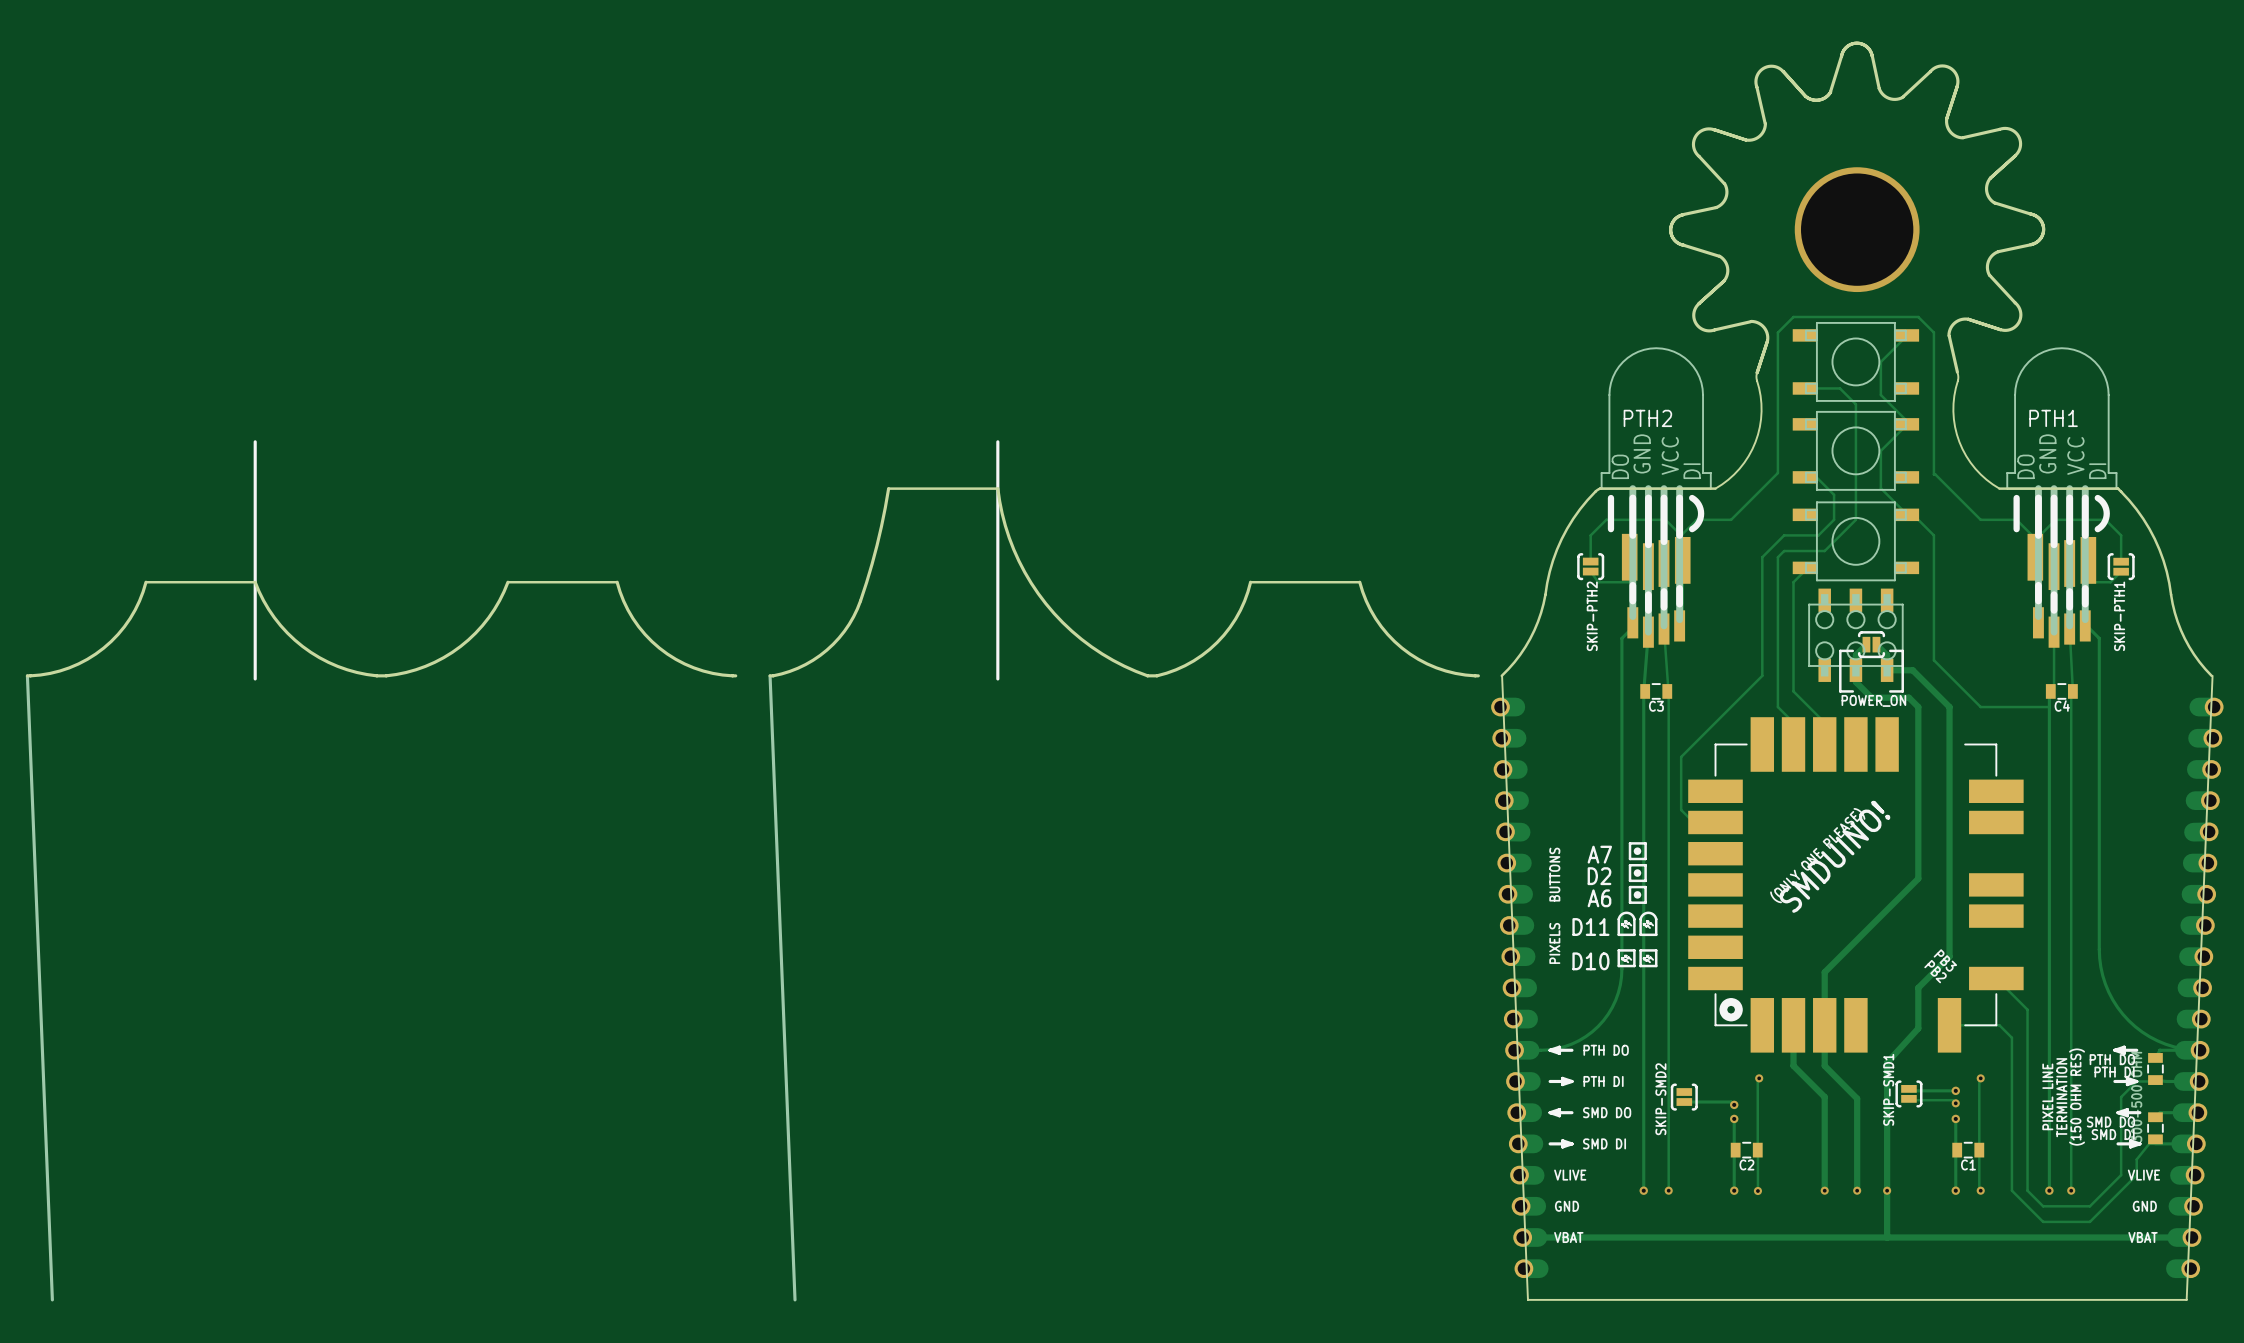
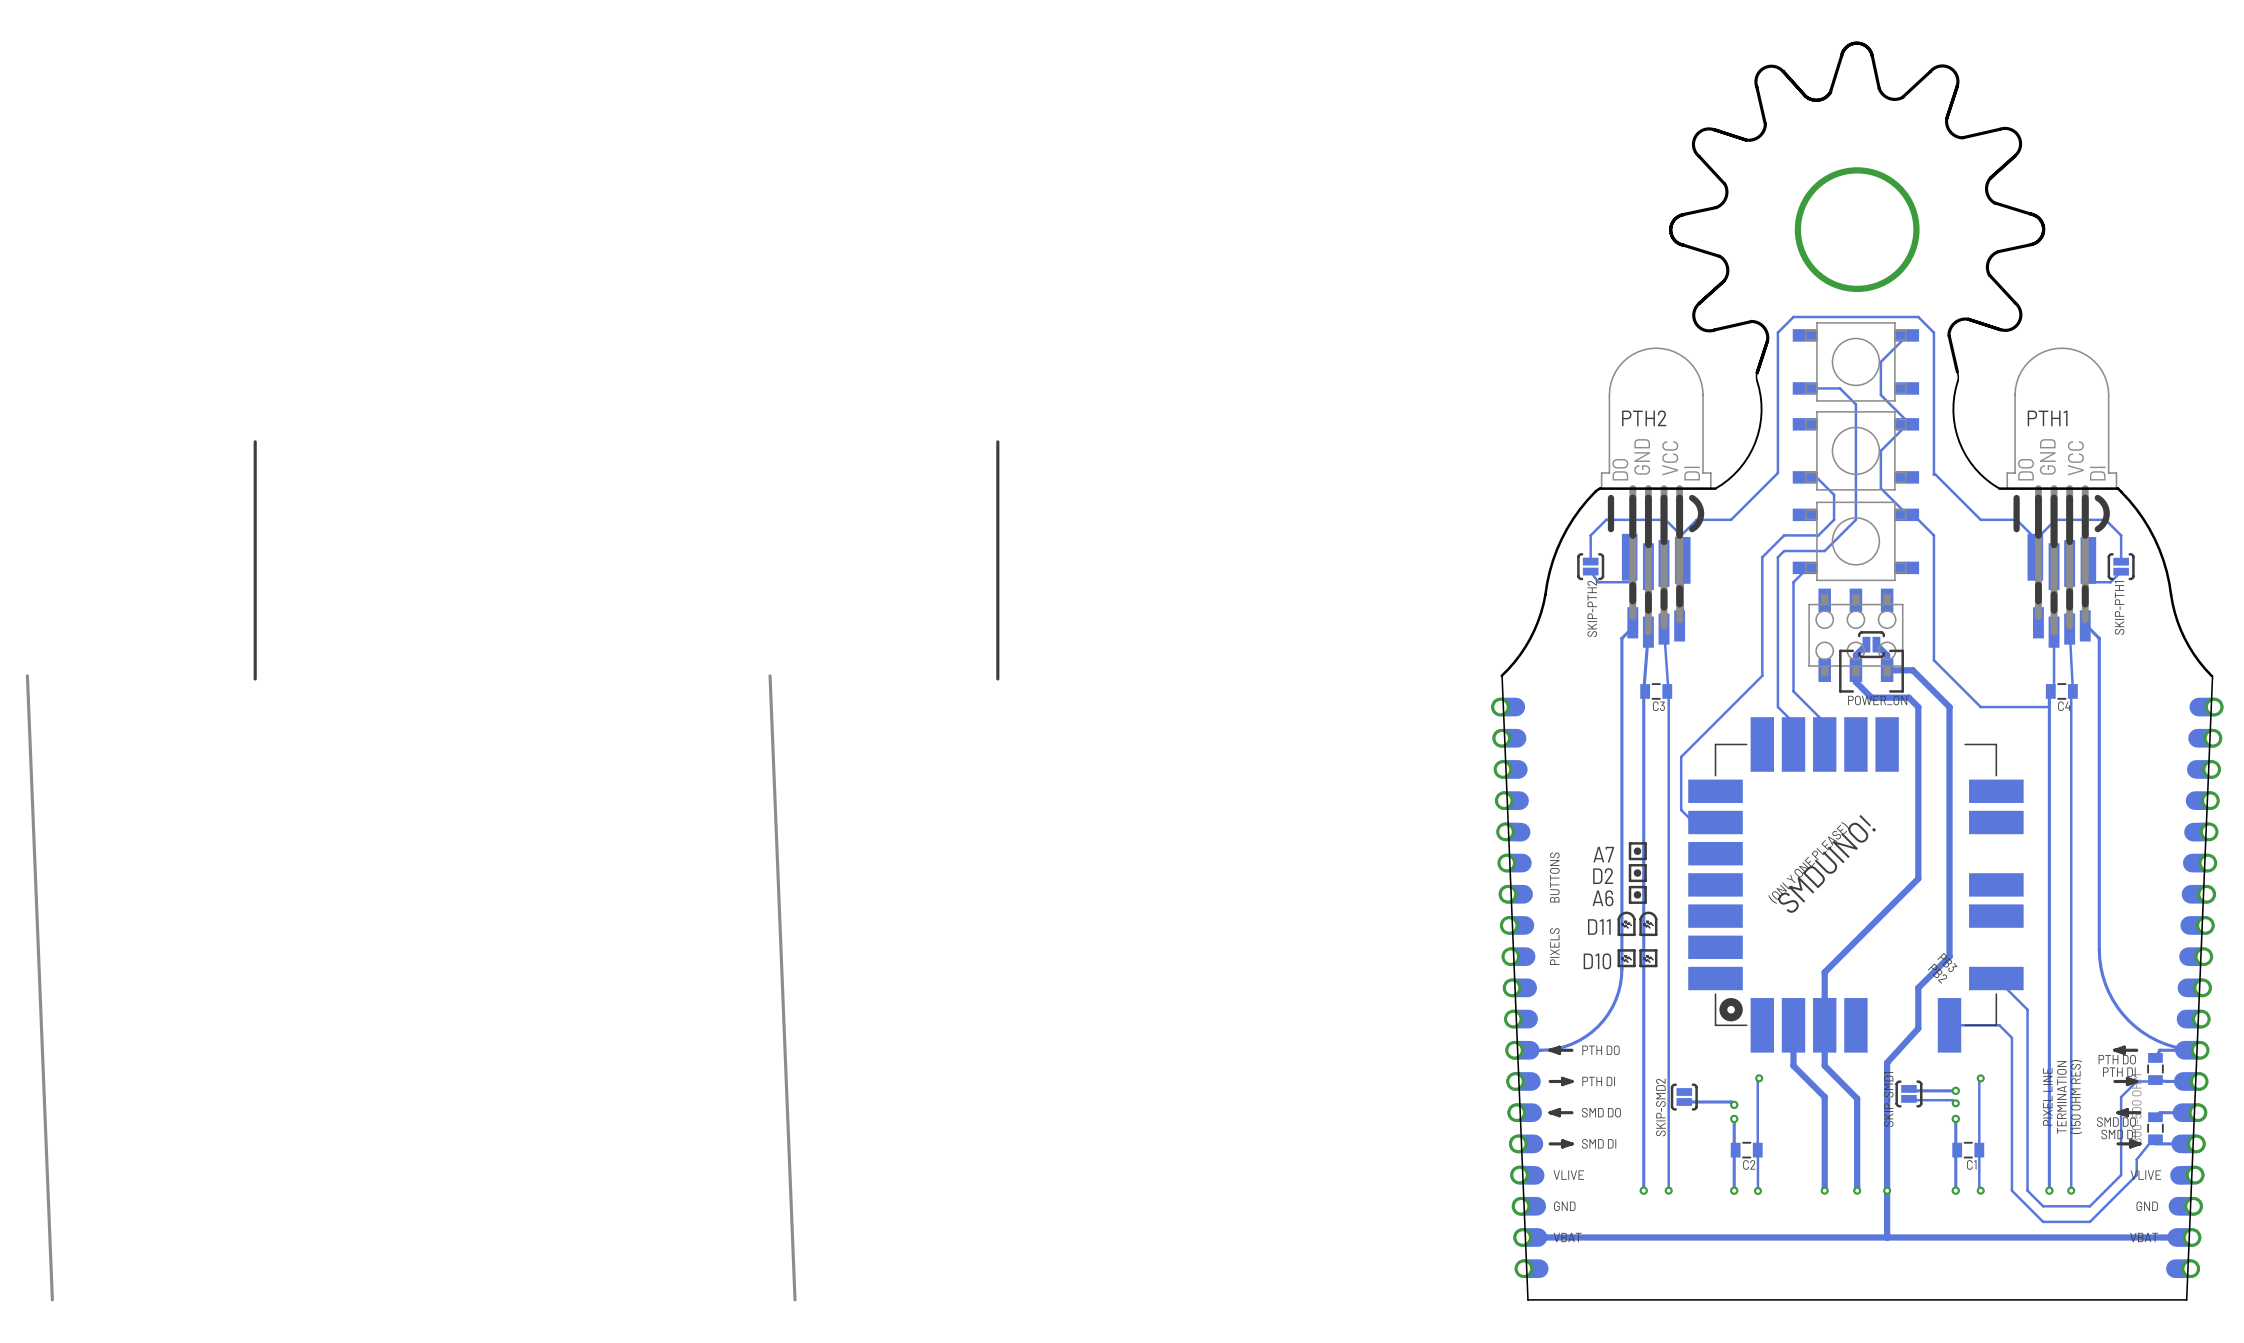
board edge: (735, 675) (712, 673) (693, 667) (675, 659) (659, 648) (645, 634) (633, 618) (623, 601) (617, 582) (507, 582) (488, 617) (460, 646) (425, 666) (386, 675) (366, 674) (347, 669) (310, 652) (294, 640) (274, 617) (255, 582) (145, 582) (139, 601) (130, 618) (118, 634) (103, 648) (87, 659) (69, 667) (50, 673) (27, 675) -> none
board edge: (1478, 675) (1455, 673) (1436, 667) (1418, 659) (1402, 648) (1387, 634) (1375, 618) (1366, 601) (1359, 582) (1250, 582) (1244, 601) (1235, 619) (1223, 635) (1202, 655) (1175, 669) (1156, 675) (1147, 675) (1135, 671) (1091, 646) (1071, 631) (1045, 603) (1024, 572) (1013, 549) (1002, 513) (997, 488) (888, 488) (872, 564) (860, 600) (849, 624) (833, 644) (813, 660) (789, 671) (770, 675) -> none

